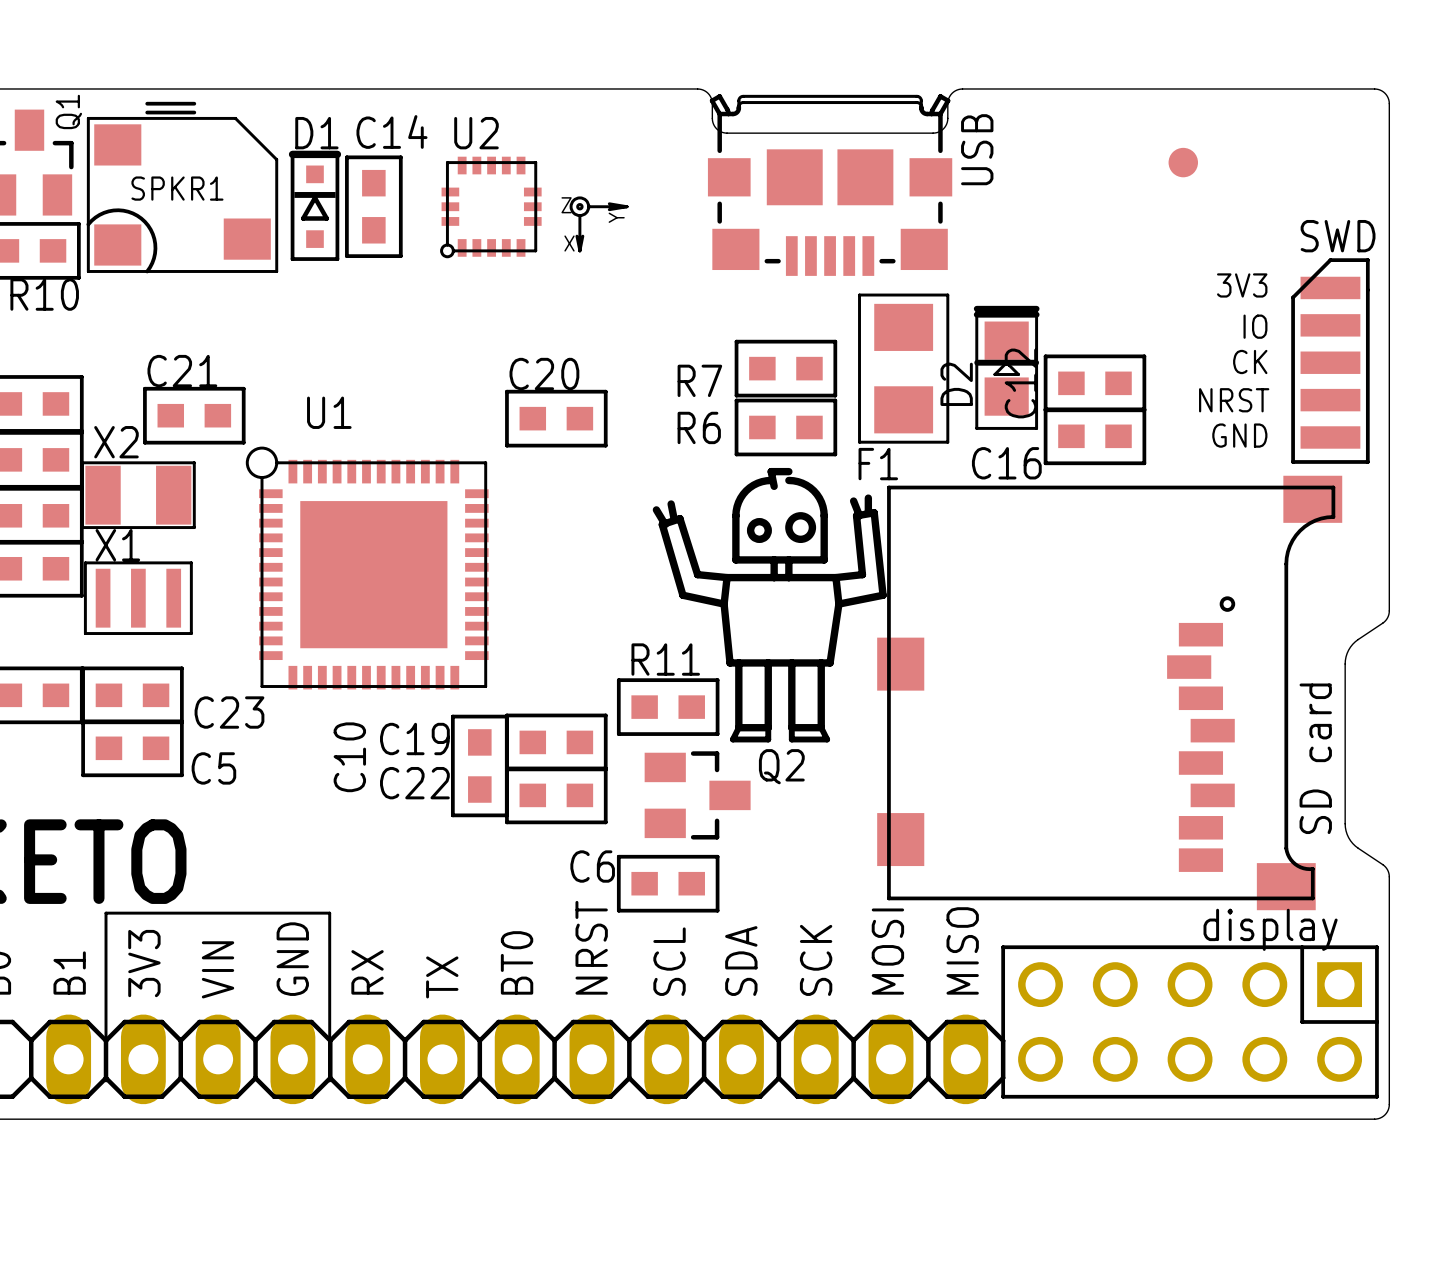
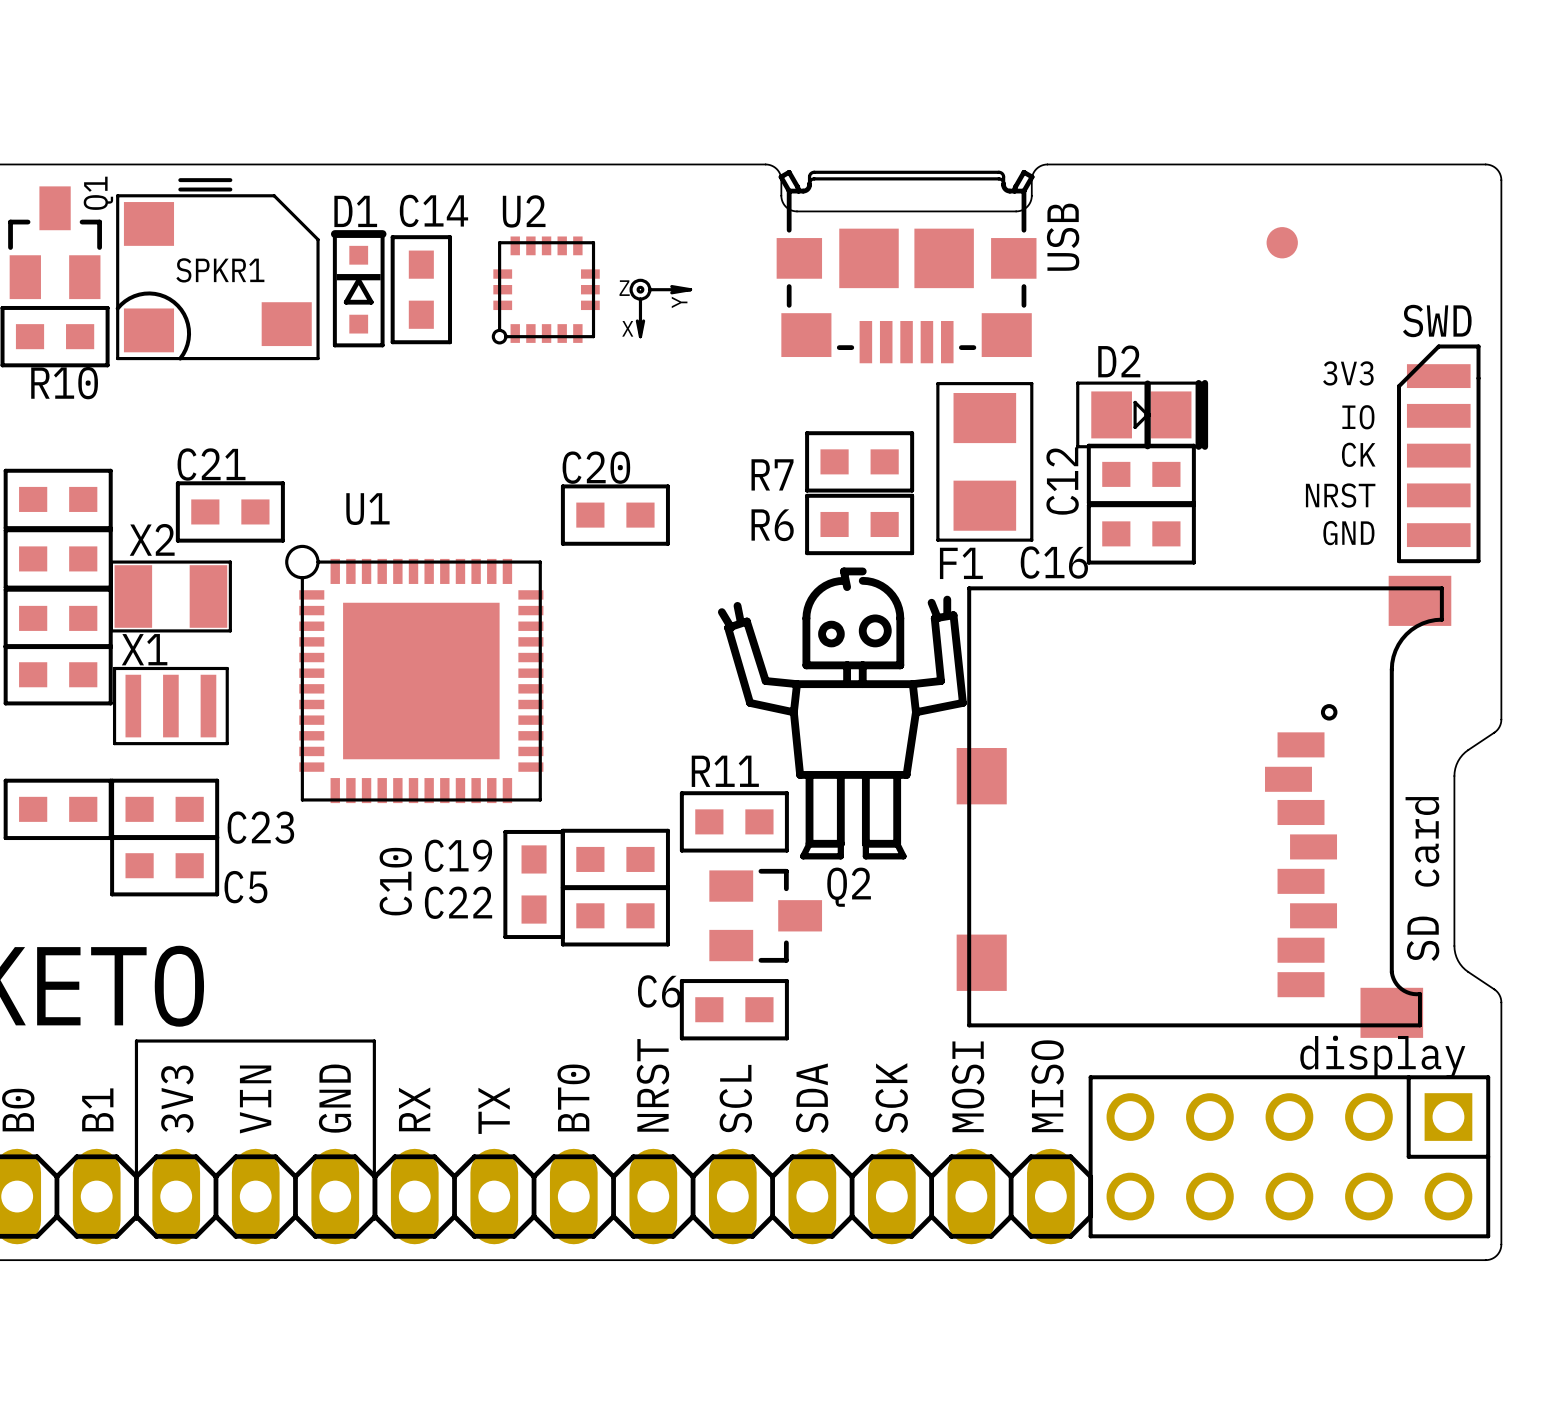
D2 rotation: 0° (1006, 367) -> 90° clockwise (1142, 414)
C12 position: (1094, 383) -> (1141, 474)
C16 position: (1094, 436) -> (1141, 533)

